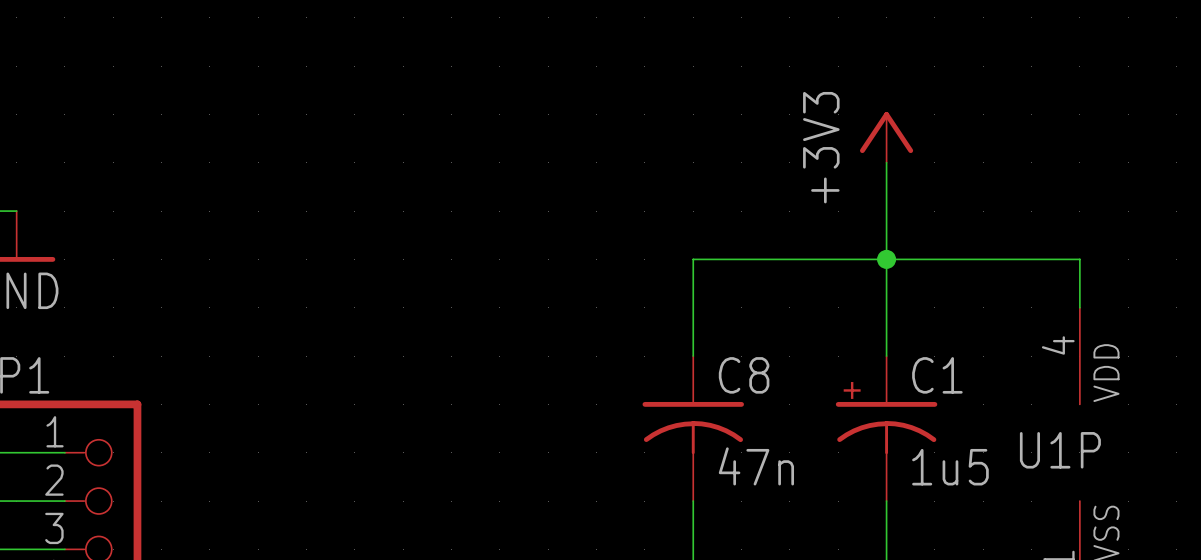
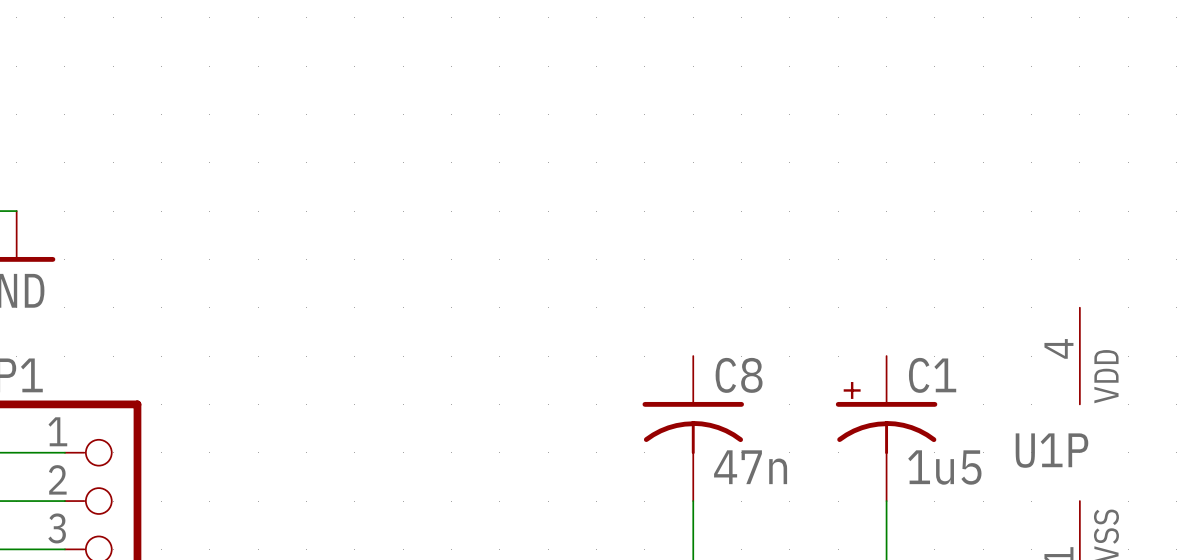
power symbol: +3V3 (886, 137) -> none
wire: (886, 162) (886, 356) -> none
junction: (886, 259) -> none
wire: (1079, 307) (1079, 259) (693, 259) (693, 356) -> none

